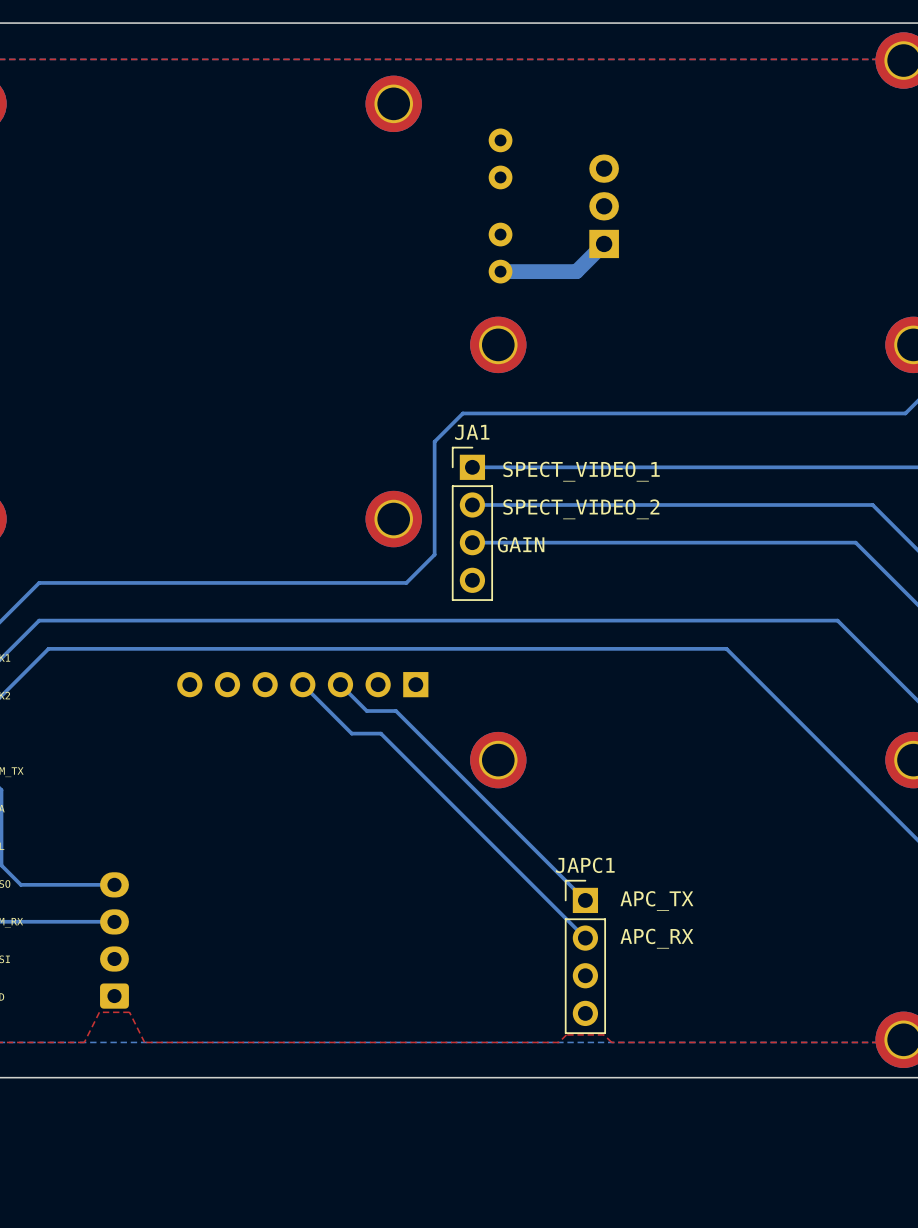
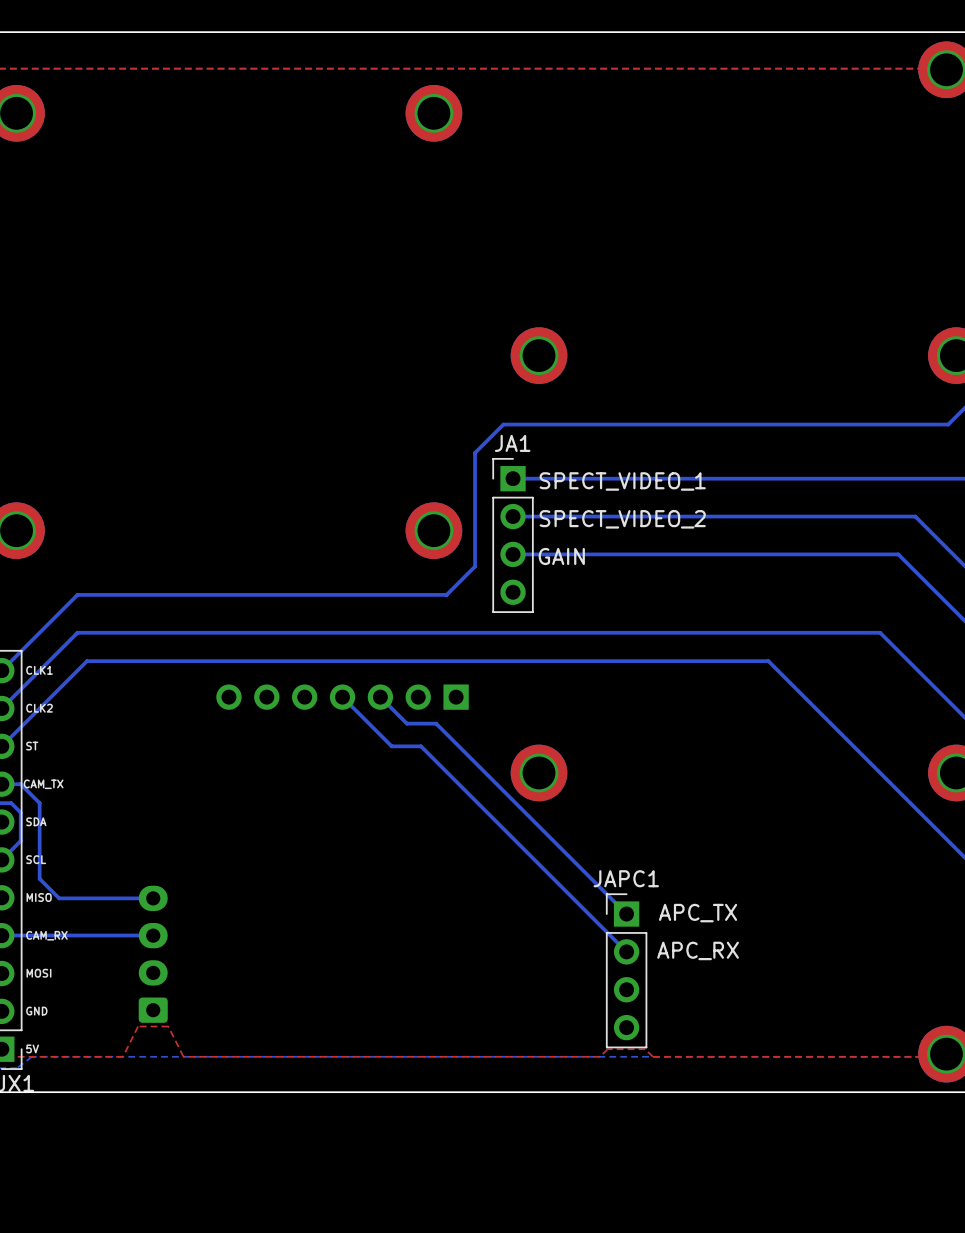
part: (500, 158) -> none
part: (604, 206) -> none
bottom track: (604, 243) (576, 271) (500, 271) -> none
part: (500, 253) -> none

